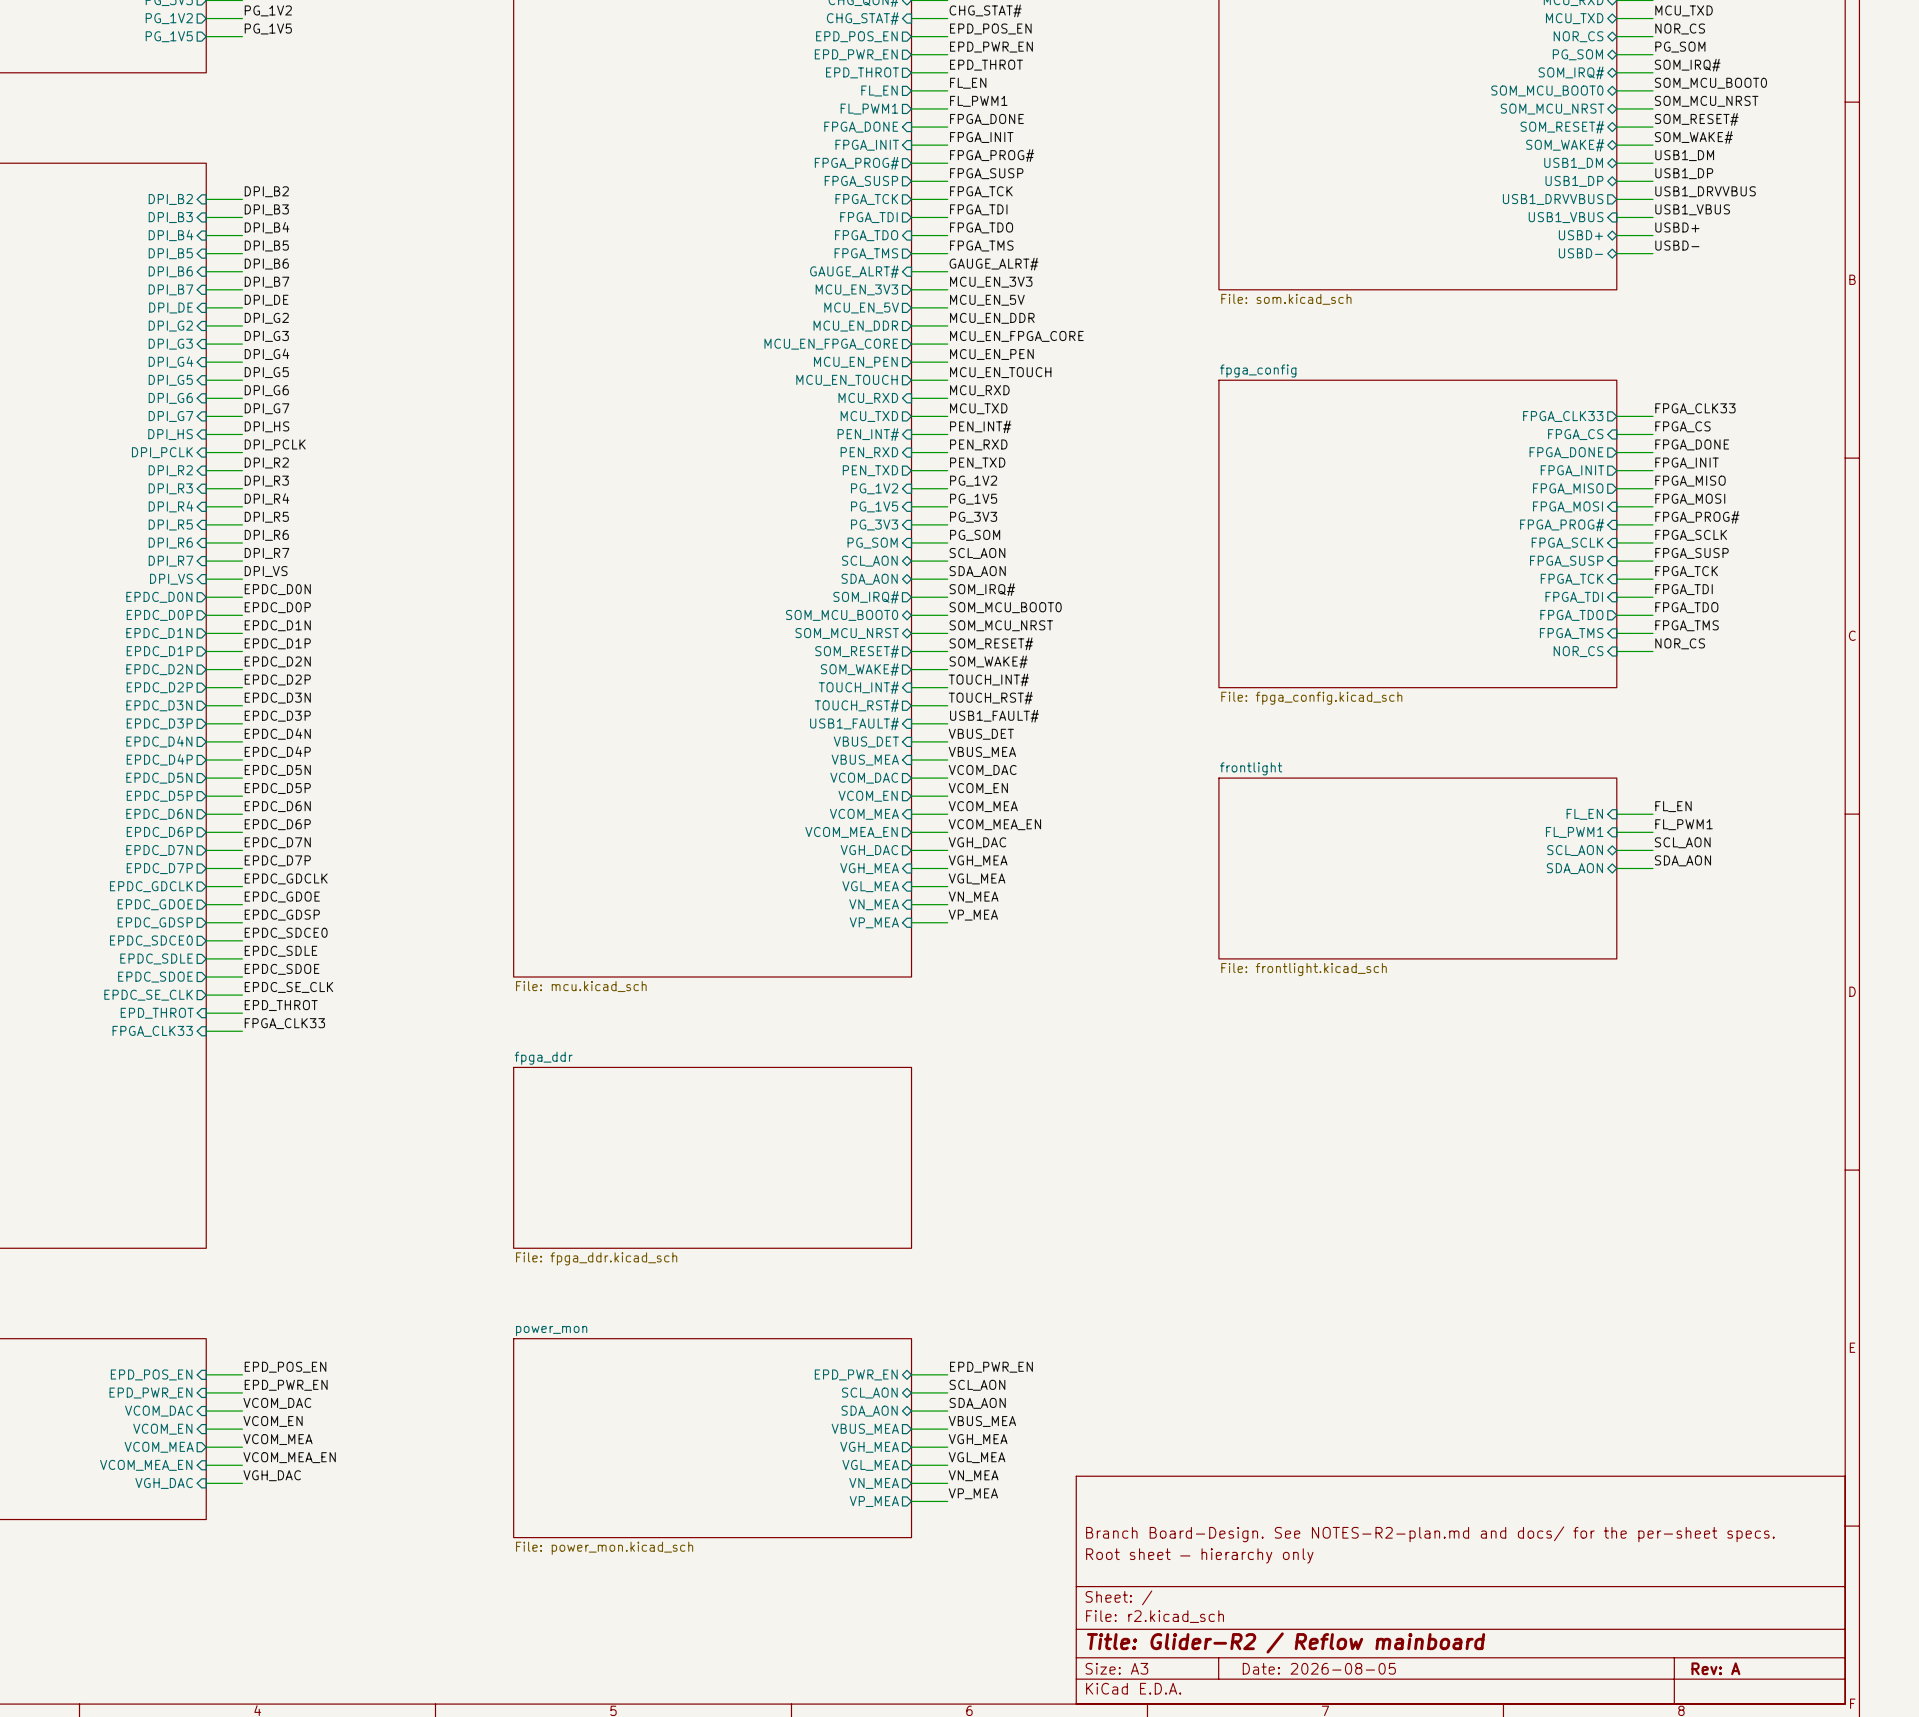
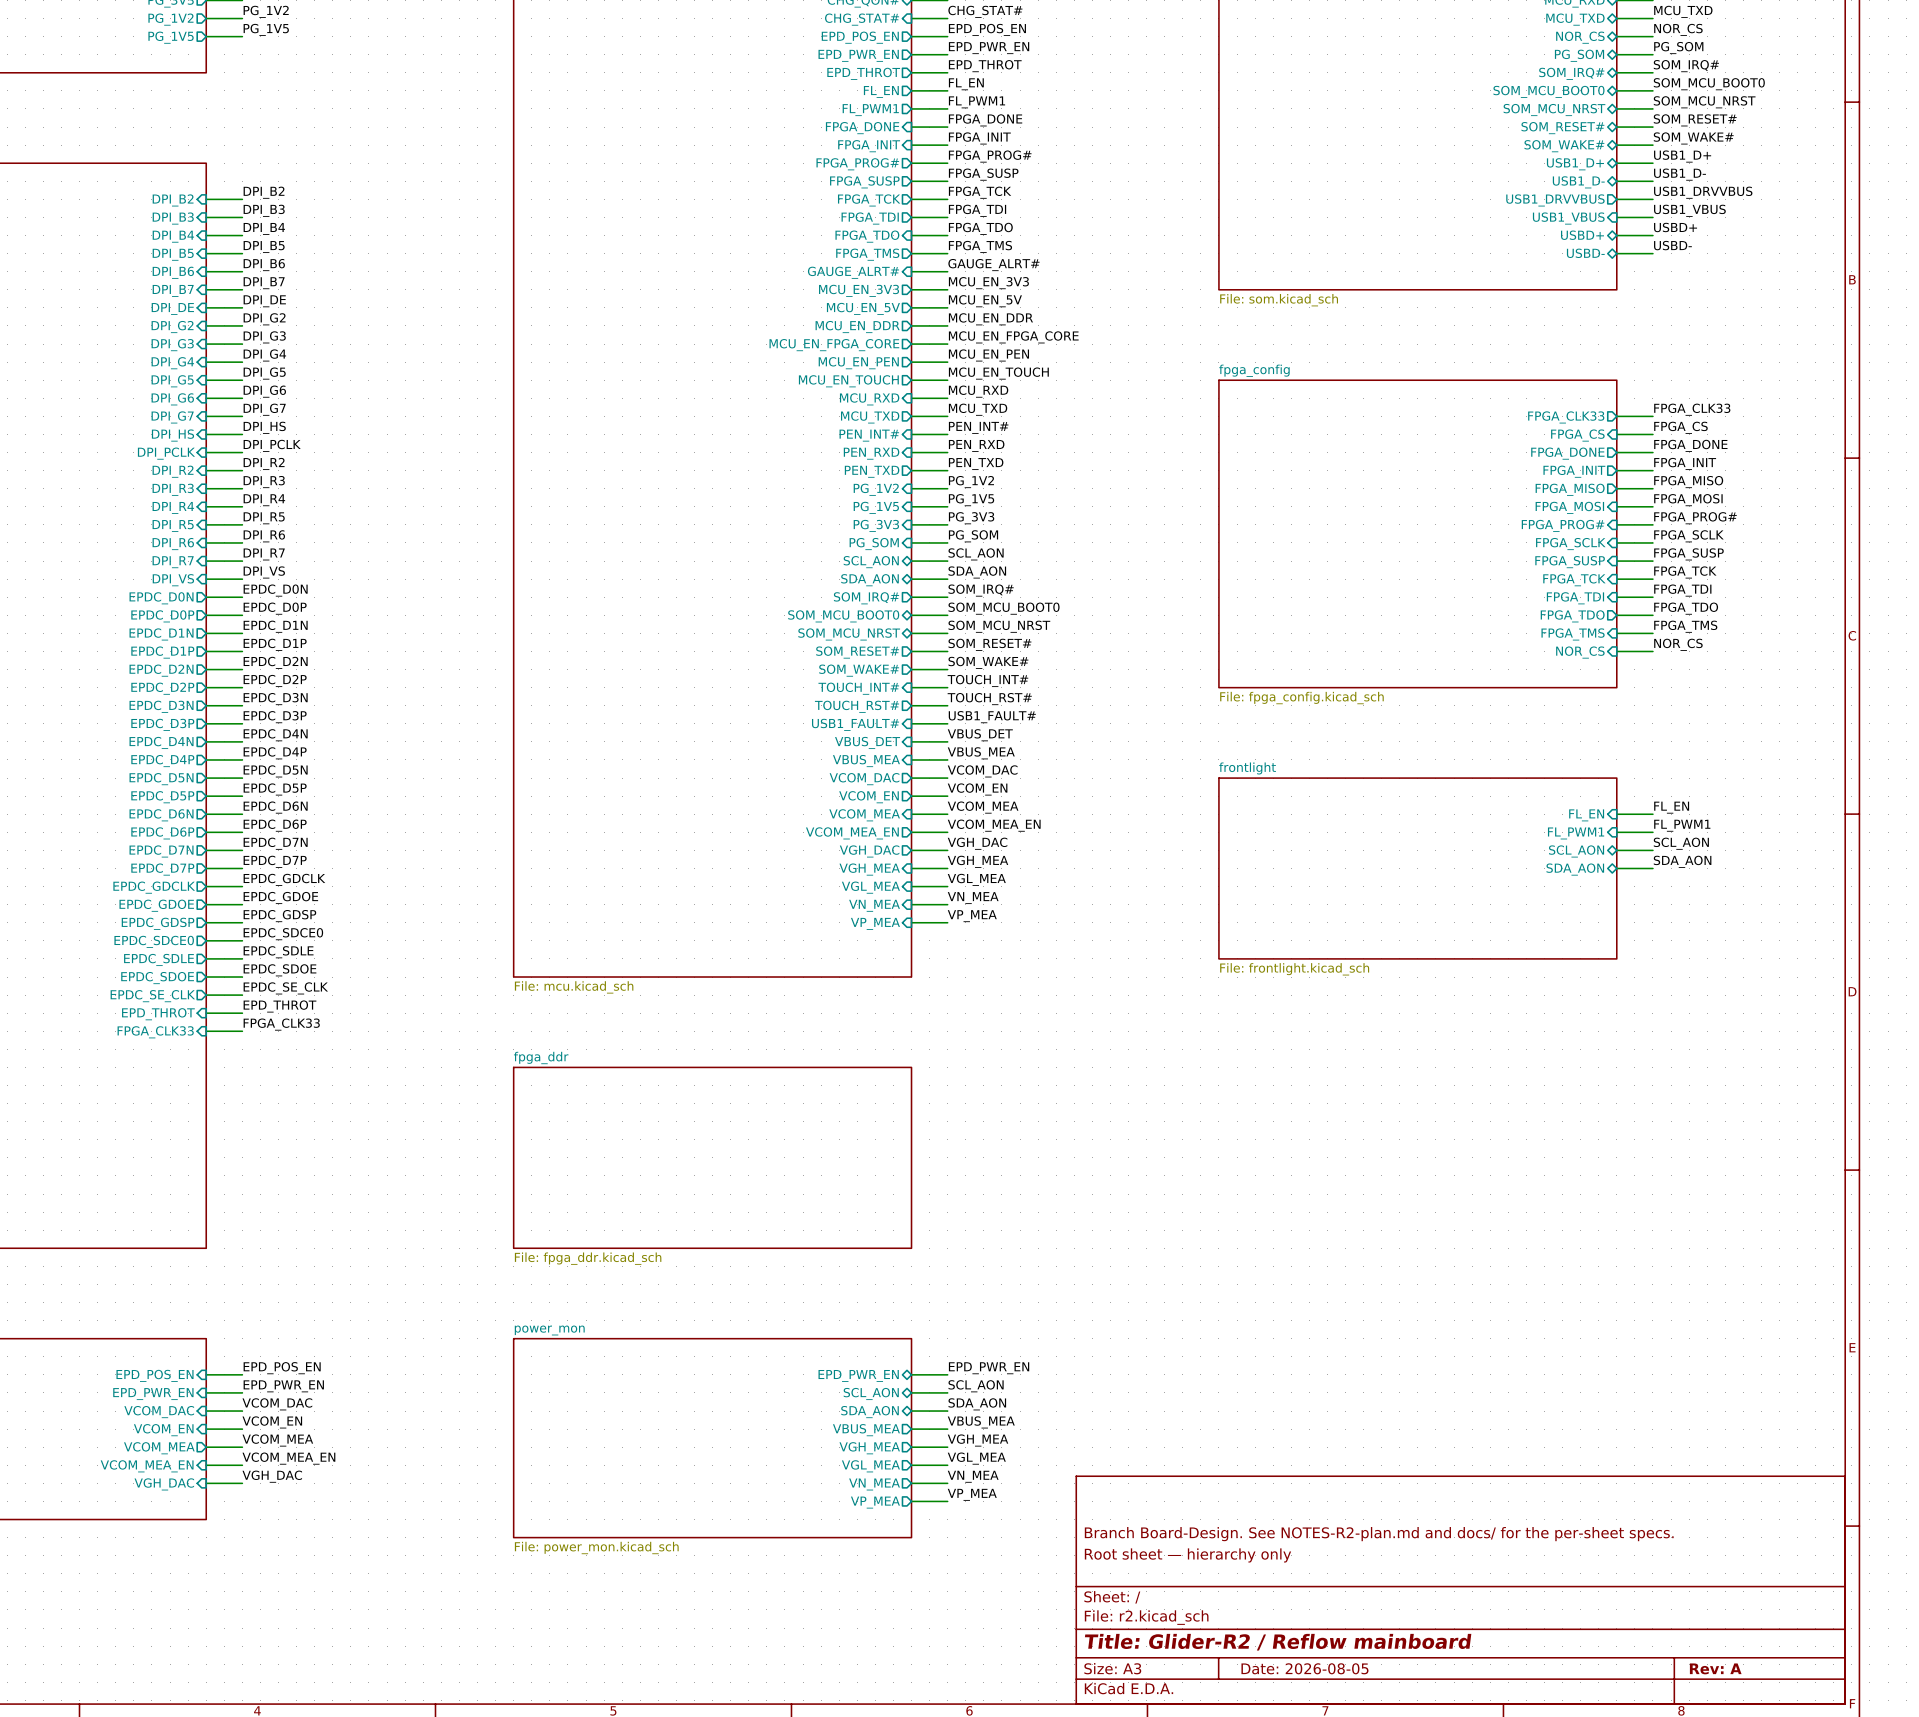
label: USB1_DM (1684, 155) -> USB1_D+ (1682, 156)
sheet pin: USB1_DM (1573, 163) -> USB1_D+ (1575, 164)
label: USB1_DP (1684, 173) -> USB1_D- (1679, 174)
sheet pin: USB1_DP (1574, 181) -> USB1_D- (1578, 182)

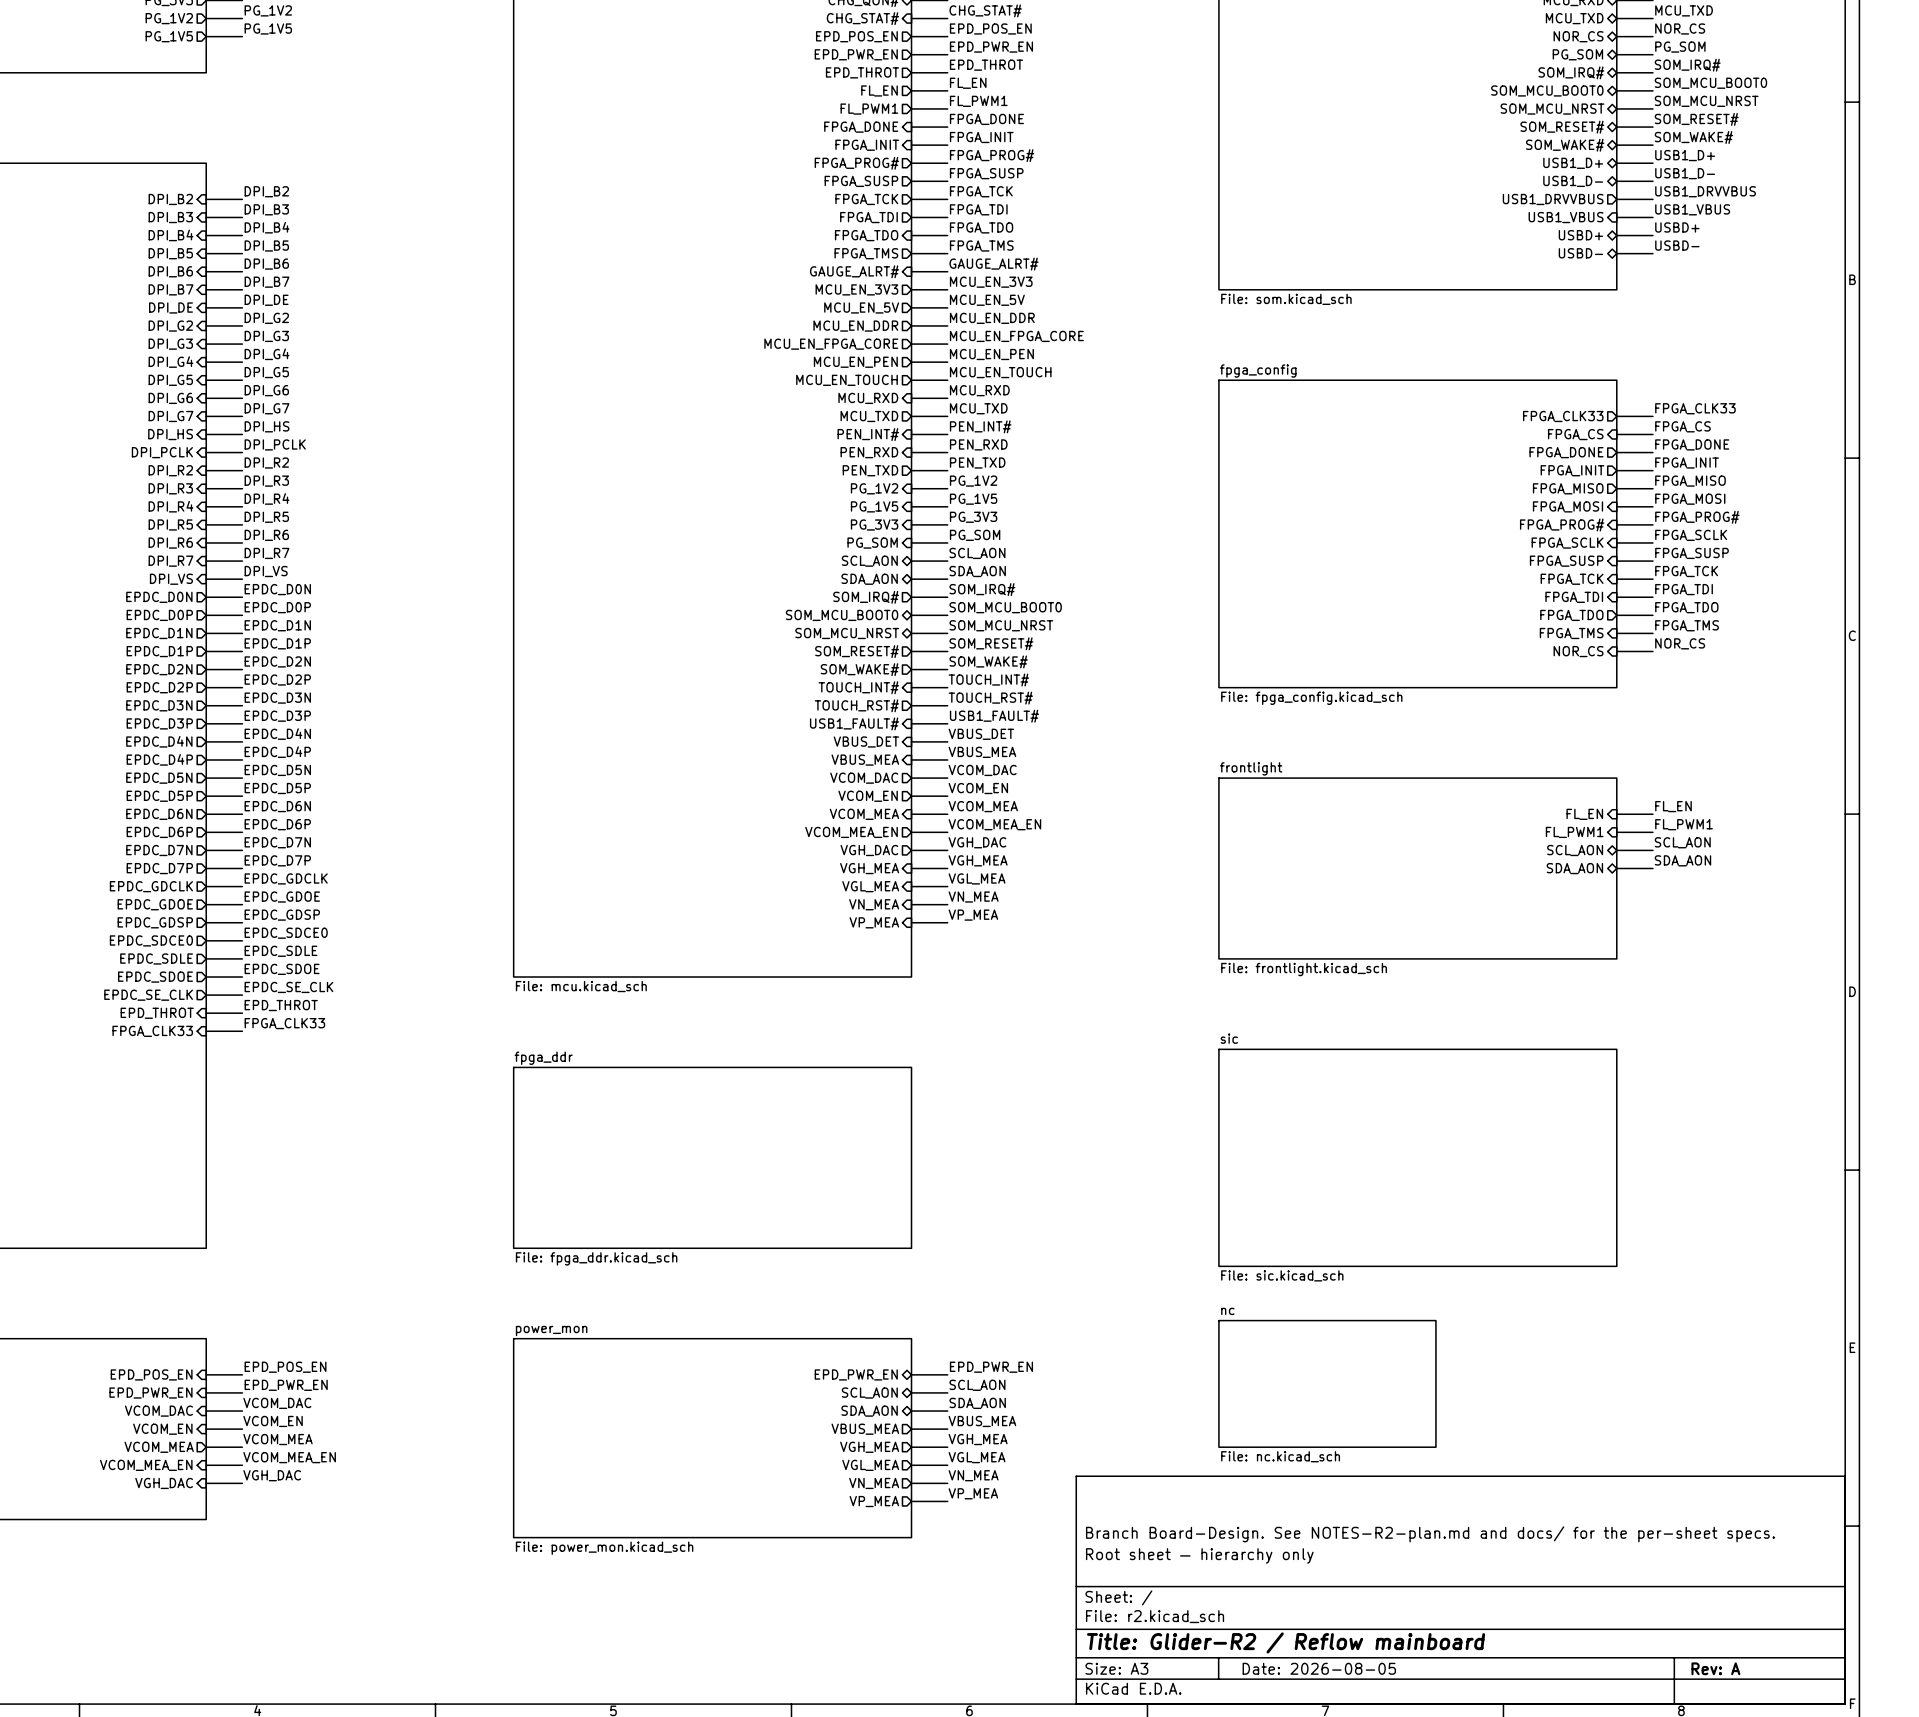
sheet sic: none -> File: sic.kicad_sch (1417, 1157)
sheet nc: none -> File: nc.kicad_sch (1327, 1383)

